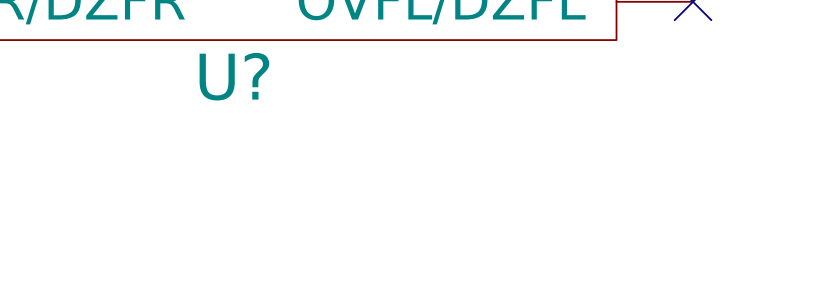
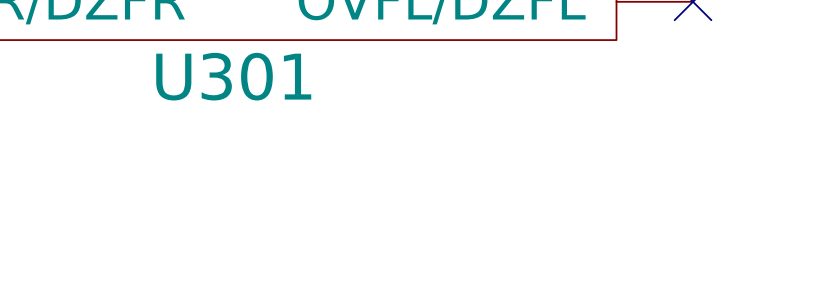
U? name: U? (234, 76) -> U301 (233, 76)

